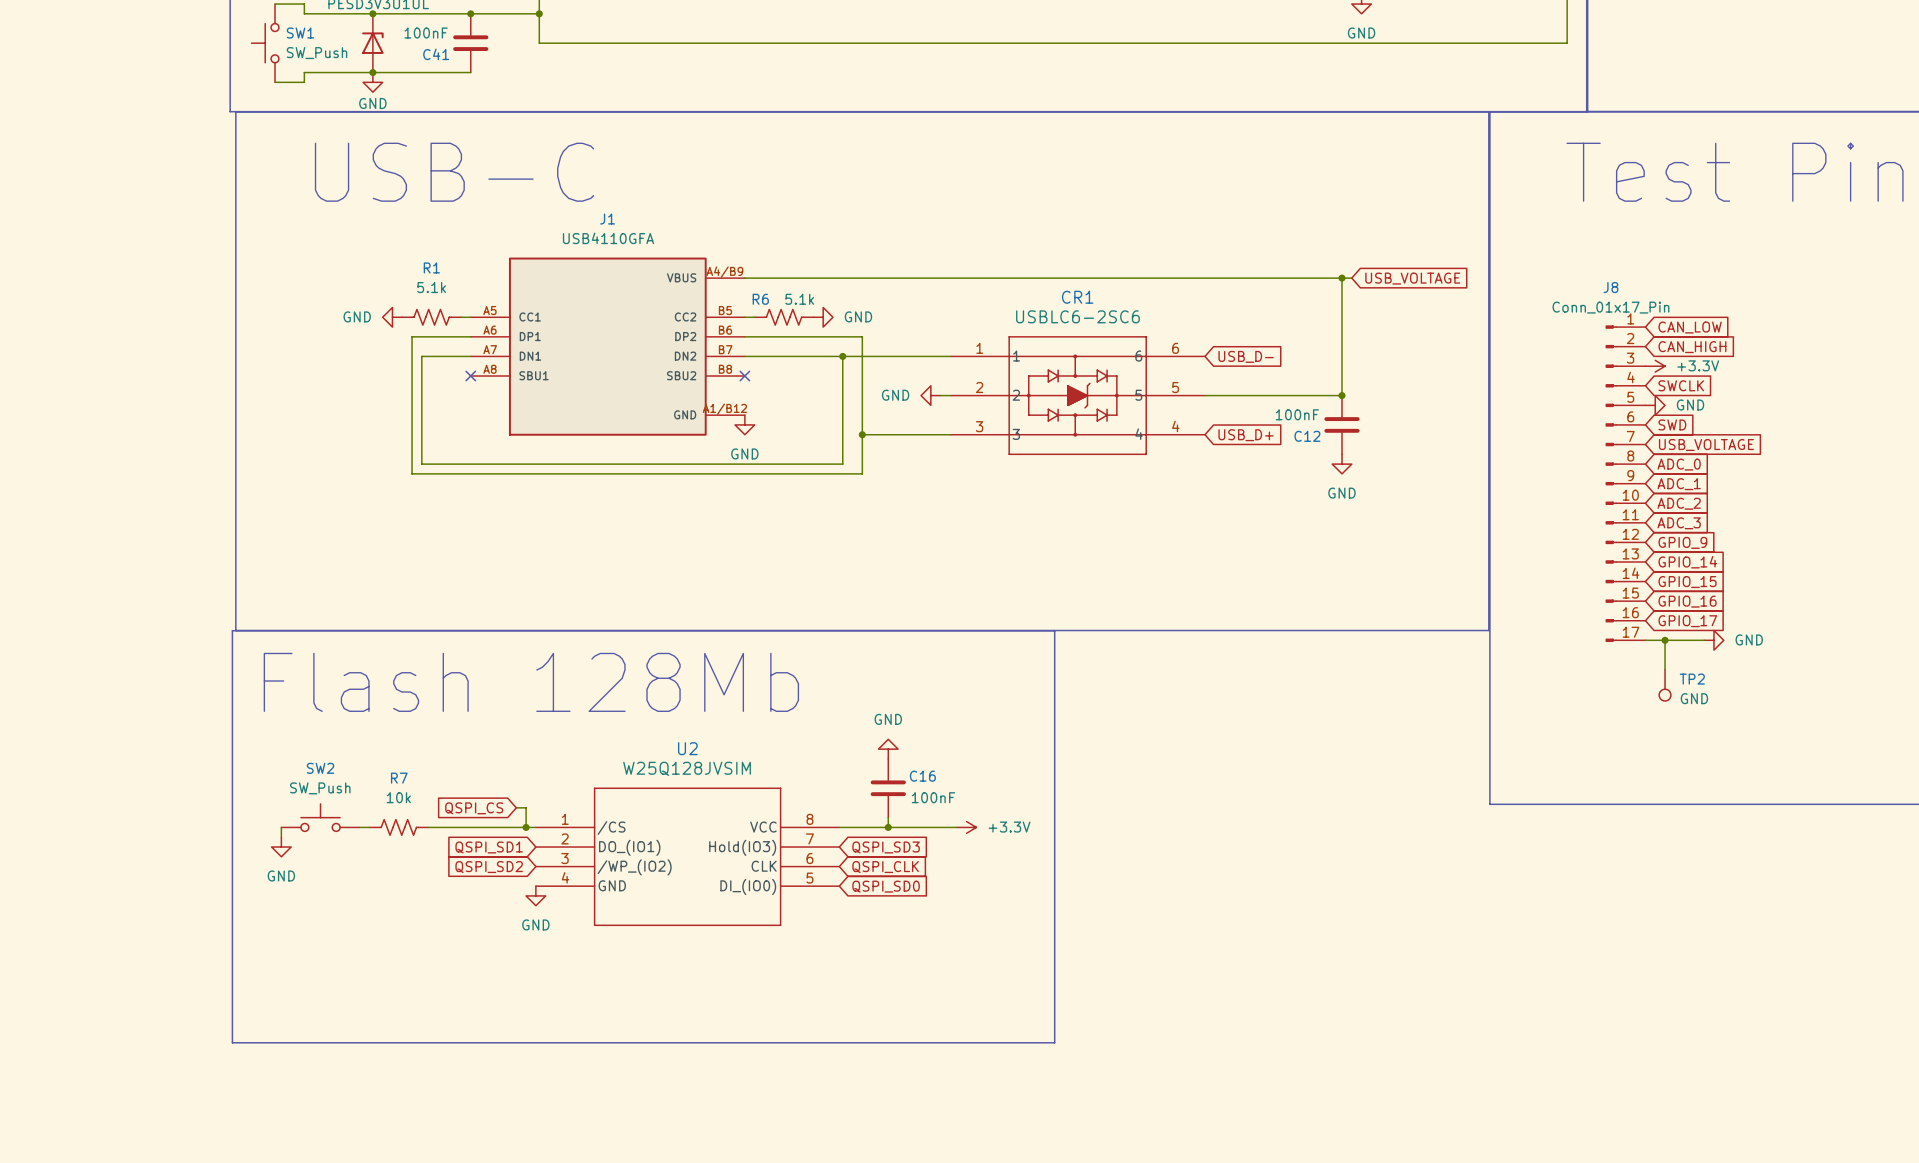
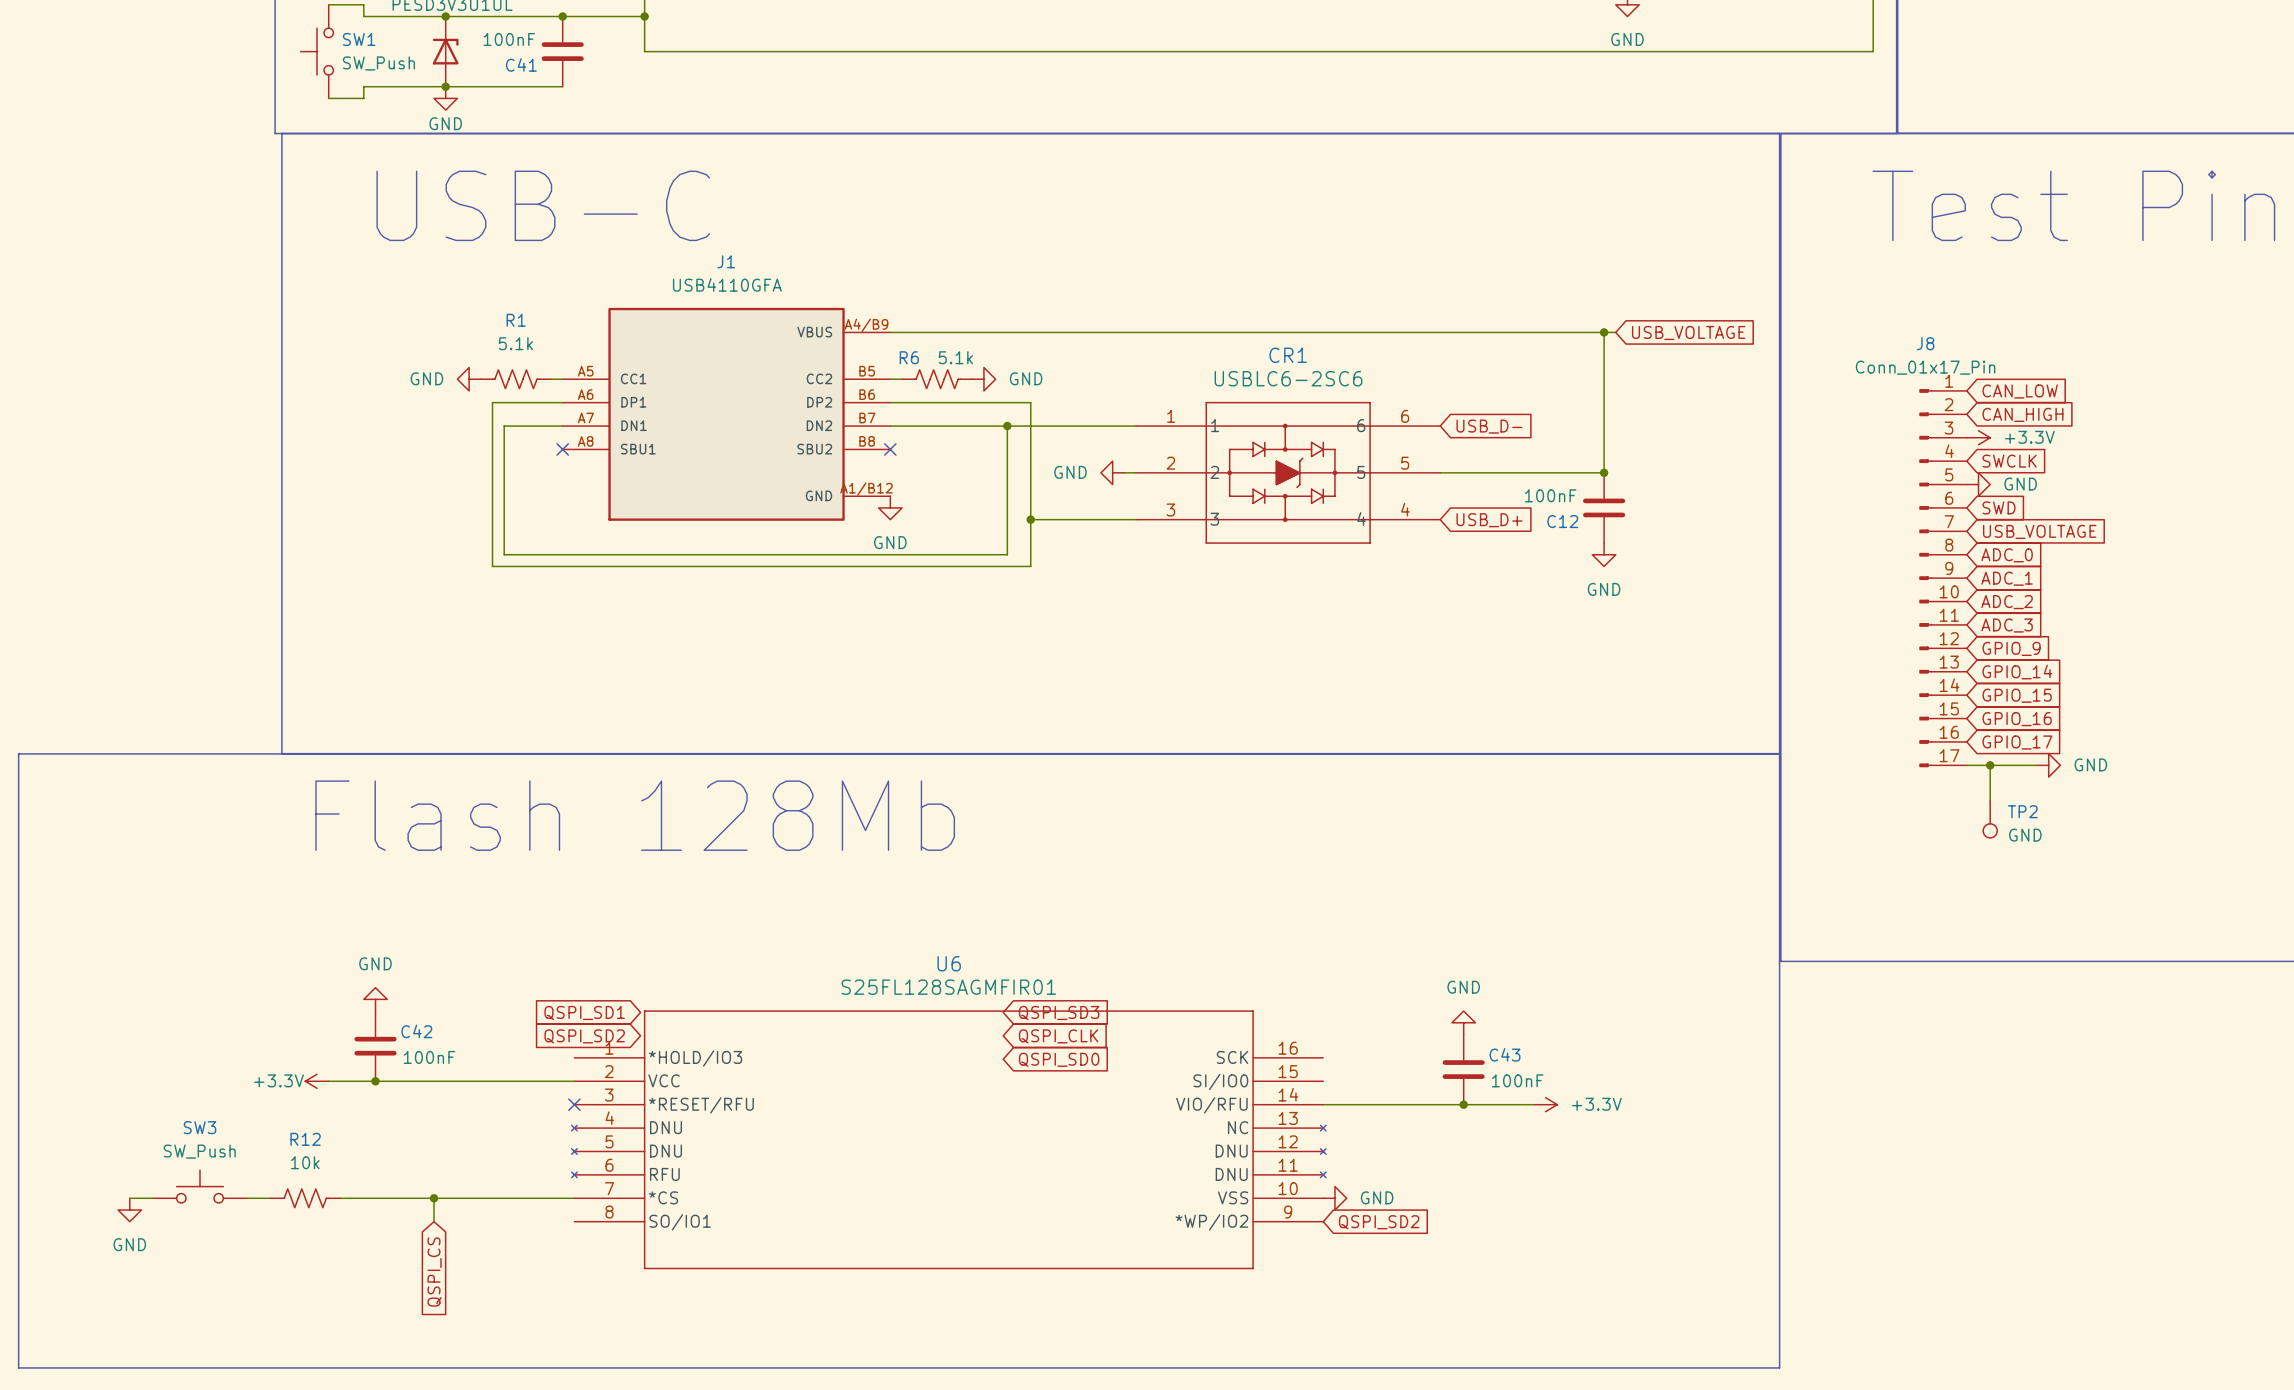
line: (232, 630) (232, 1042) (1054, 1042) (1054, 630) -> (277, 753) (18, 753) (18, 1367) (1779, 1367) (1779, 753) (1260, 753)
power symbol: GND (888, 749) -> none
C16: 100nF (888, 788) -> none
wire: (516, 807) (526, 807) (526, 827) -> none
global label: QSPI_CS (474, 808) -> none
SW2: SW_Push (320, 817) -> none
wire: (888, 817) (888, 827) -> none
wire: (281, 827) (281, 837) -> none
wire: (359, 827) (369, 827) -> none
R7: 10k (398, 827) -> none
wire: (428, 827) (535, 827) -> none
junction: (526, 827) -> none
wire: (839, 827) (956, 827) -> none
junction: (888, 827) -> none
power symbol: +3.3V (966, 827) -> none
power symbol rotation: 0° (281, 847) -> 180° (375, 999)
power symbol position: GND (281, 847) -> GND (375, 999)
power symbol: none -> GND (1463, 1022)
U2: W25Q128JVSIM (687, 856) -> none
C42: none -> 100nF (375, 1046)
C43: none -> 100nF (1463, 1069)
power symbol: GND (535, 895) -> none
power symbol: none -> +3.3V (317, 1081)
wire: none -> (328, 1081) (574, 1081)
junction: none -> (375, 1081)
no-connect mark: none -> (574, 1104)
wire: none -> (1323, 1104) (1533, 1104)
junction: none -> (1463, 1104)
power symbol: none -> +3.3V (1545, 1104)
U6: none -> S25FL128SAGMFIR01 (948, 1139)
SW3: none -> SW_Push (199, 1186)
wire: none -> (129, 1198) (153, 1198)
wire: none -> (246, 1198) (270, 1198)
R12: none -> 10k (305, 1198)
wire: none -> (340, 1198) (574, 1198)
wire: none -> (434, 1198) (434, 1221)
junction: none -> (434, 1198)
power symbol: none -> GND (1334, 1198)
power symbol: none -> GND (129, 1209)
global label: none -> QSPI_SD2 (1379, 1222)
global label: none -> QSPI_CS (434, 1271)

